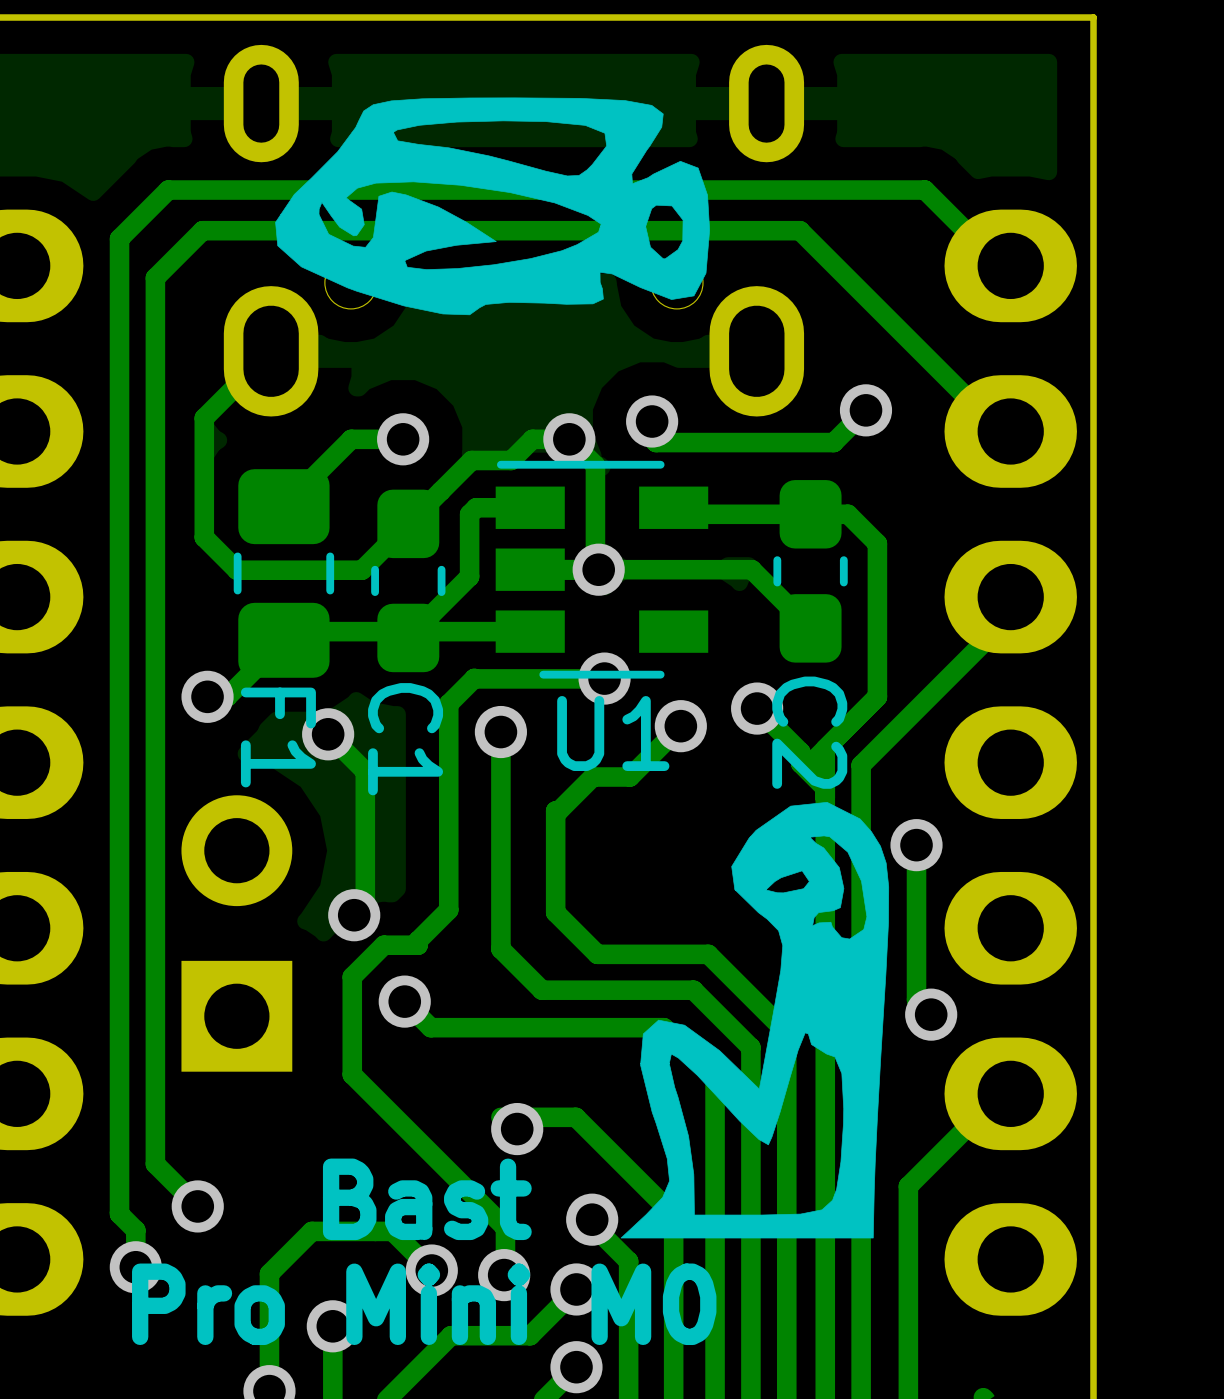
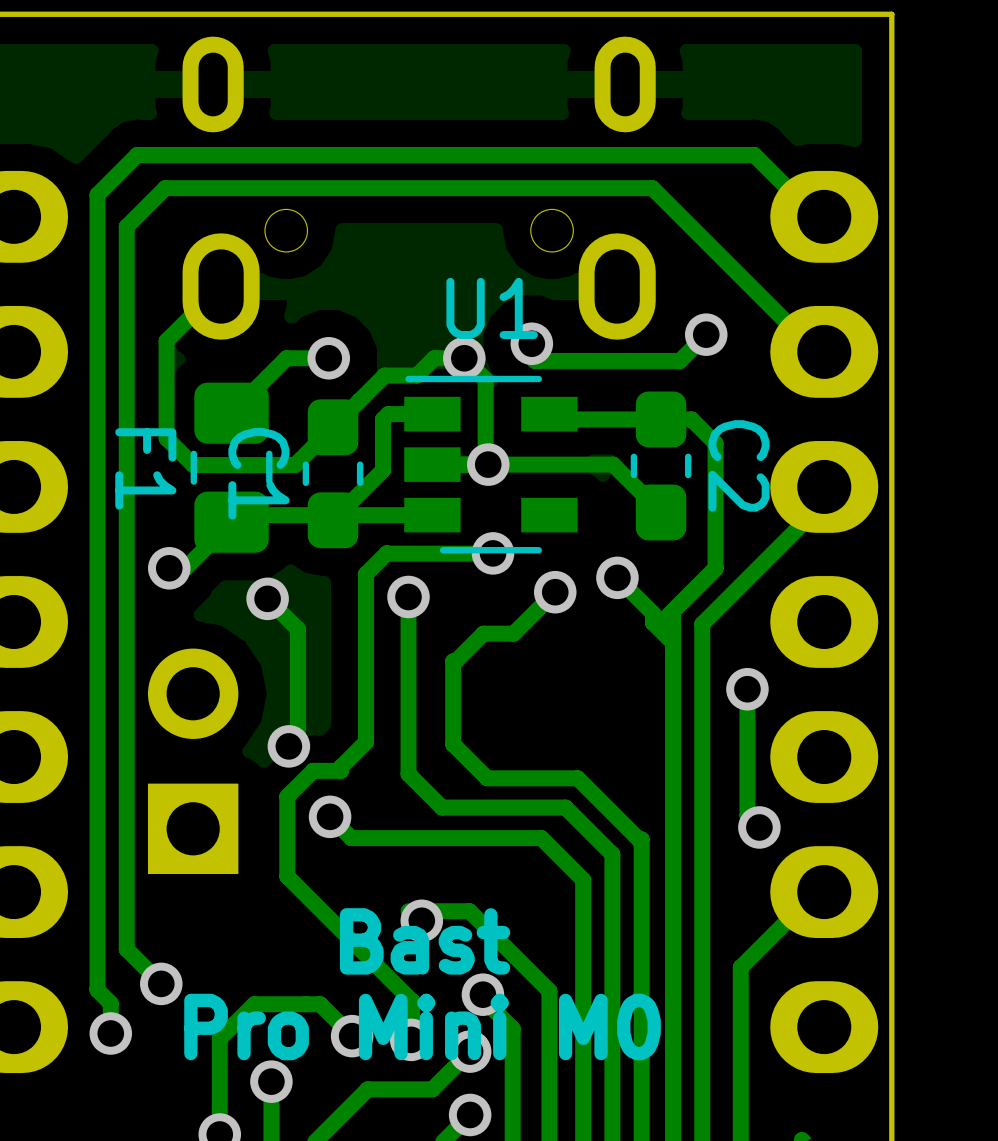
drawing: [275, 97, 710, 316] -> none
C2 name position: C2 (809, 732) -> C2 (739, 465)
U1 name position: U1 (613, 733) -> U1 (492, 308)
F1 name position: F1 (278, 737) -> F1 (145, 468)
C1 name position: C1 (405, 739) -> C1 (258, 473)
drawing: [620, 802, 890, 1239] -> none
text position: Bast (427, 1199) -> Bast (425, 941)
text position: Pro Mini M0 (424, 1304) -> Pro Mini M0 (422, 1026)

